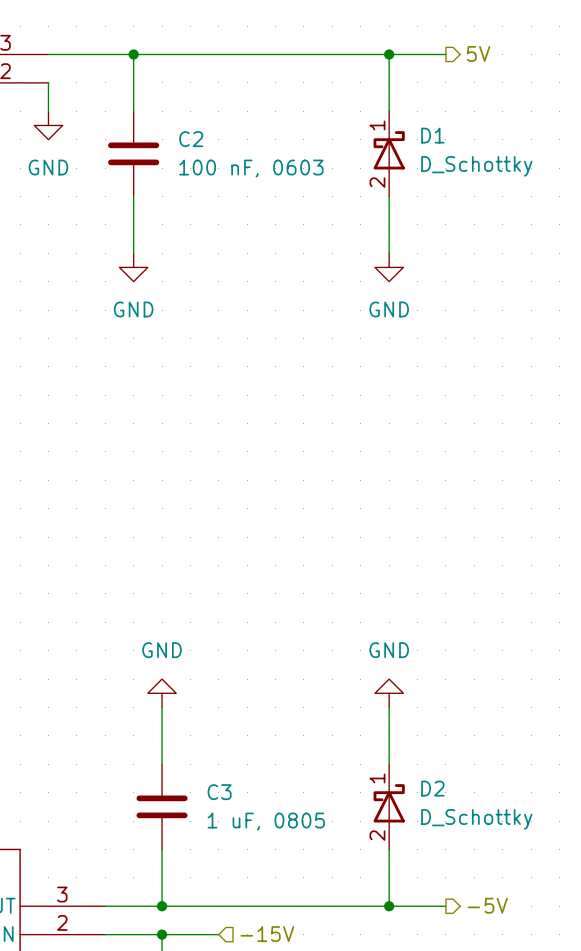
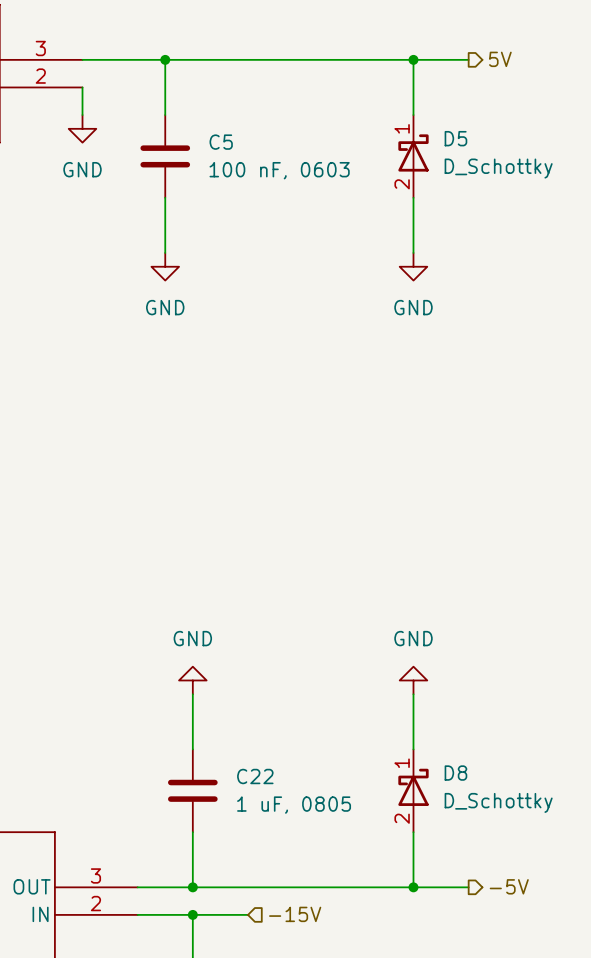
D1 name: D1 (432, 135) -> D5 (455, 138)
C2 name: C2 (191, 139) -> C5 (221, 142)
D2 name: D2 (432, 788) -> D8 (455, 773)
C3 name: C3 (219, 792) -> C22 (255, 776)

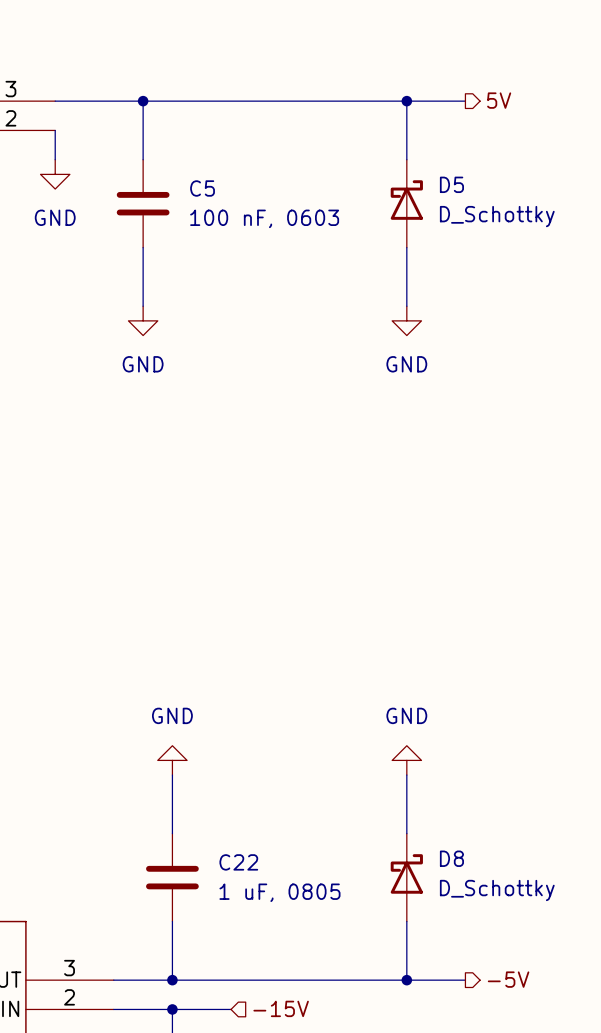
D5 pin number: 1 (402, 128) -> none
D5 pin number: 2 (402, 184) -> none
D8 pin number: 1 (402, 763) -> none
D8 pin number: 2 (402, 818) -> none

